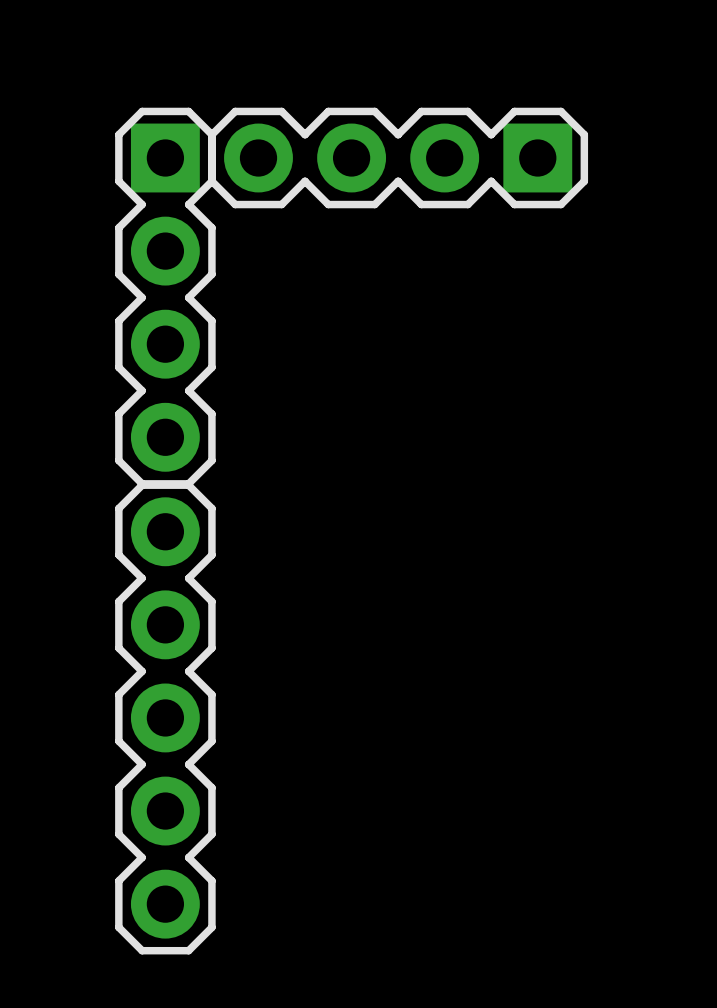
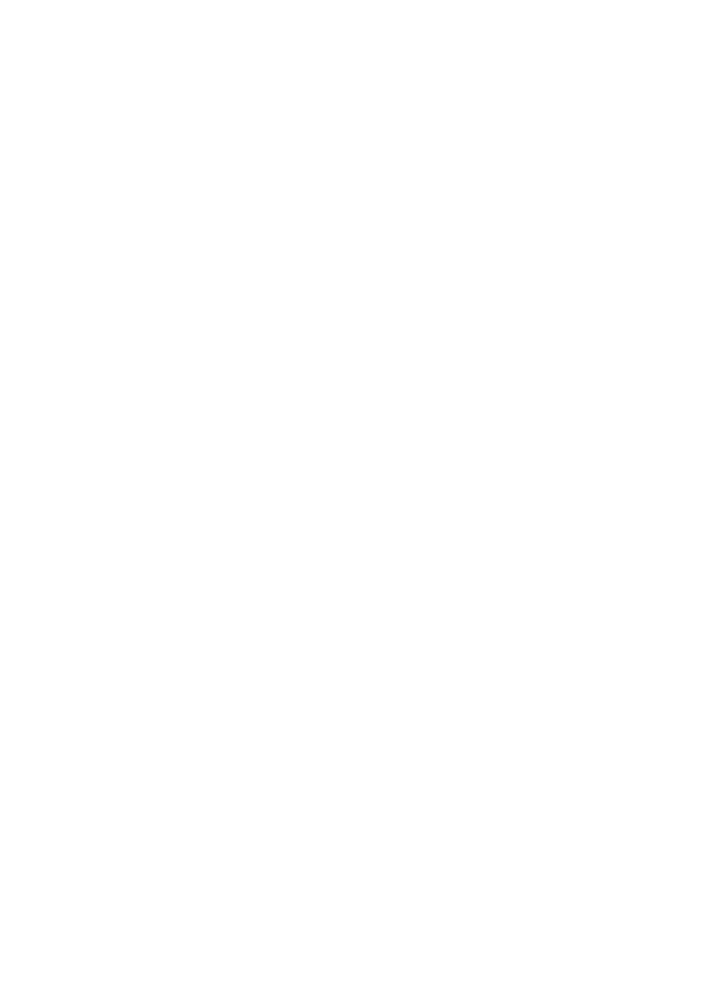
part: (398, 158) -> none
part: (165, 297) -> none
part: (165, 717) -> none

